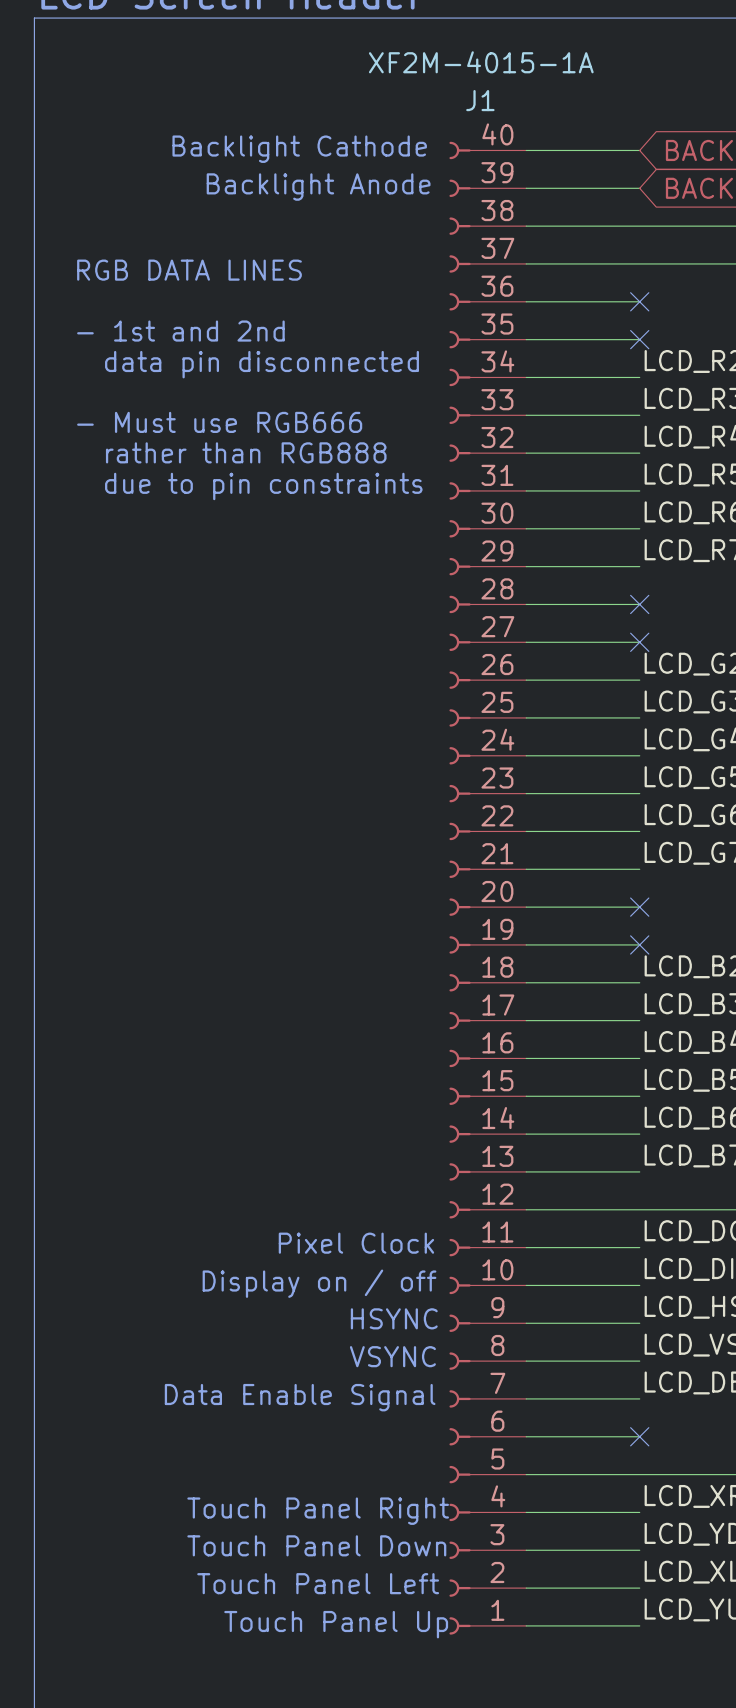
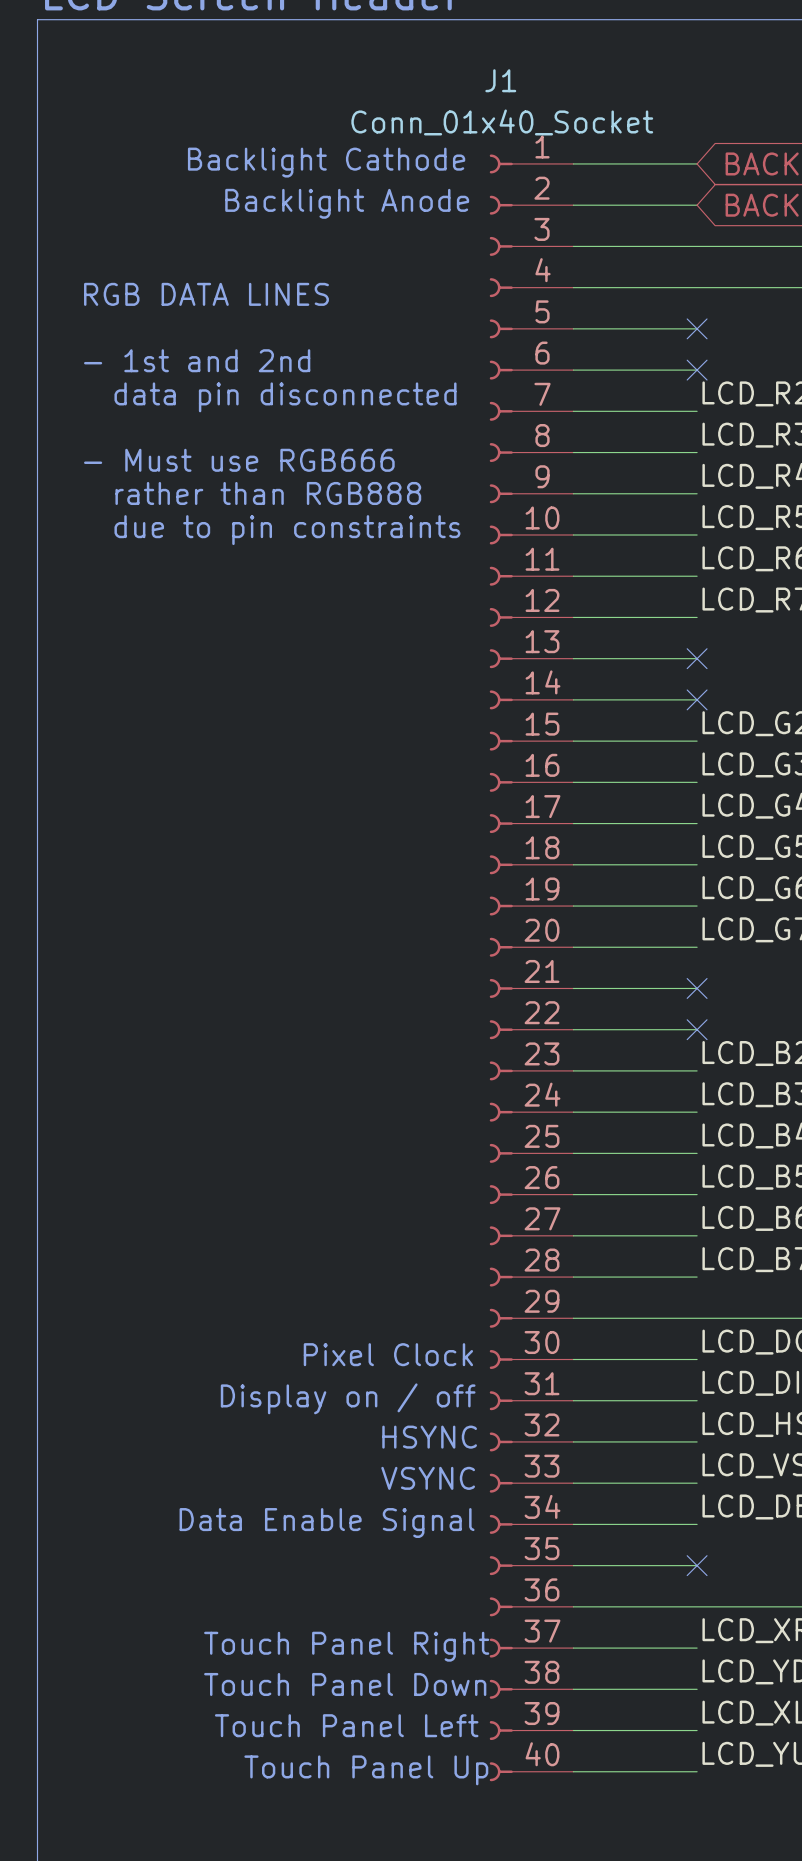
J1 value: XF2M-4015-1A (481, 62) -> Conn_01x40_Socket (502, 122)
J1 name position: J1 (480, 100) -> J1 (500, 80)
J1 flip: as is (460, 888) -> up-down (501, 967)

